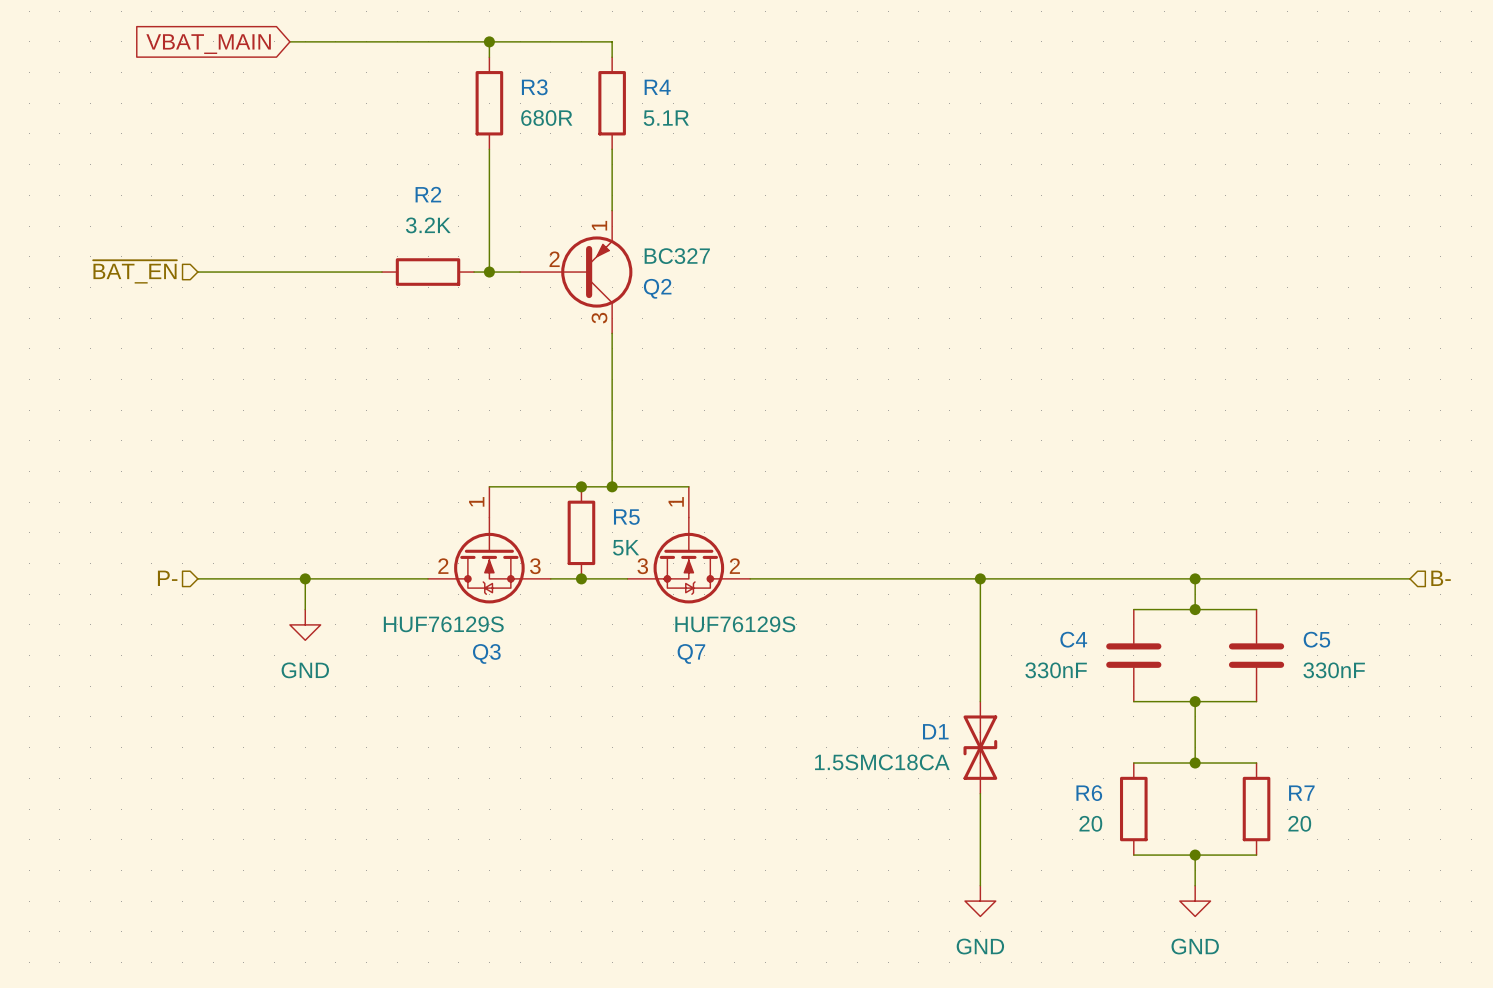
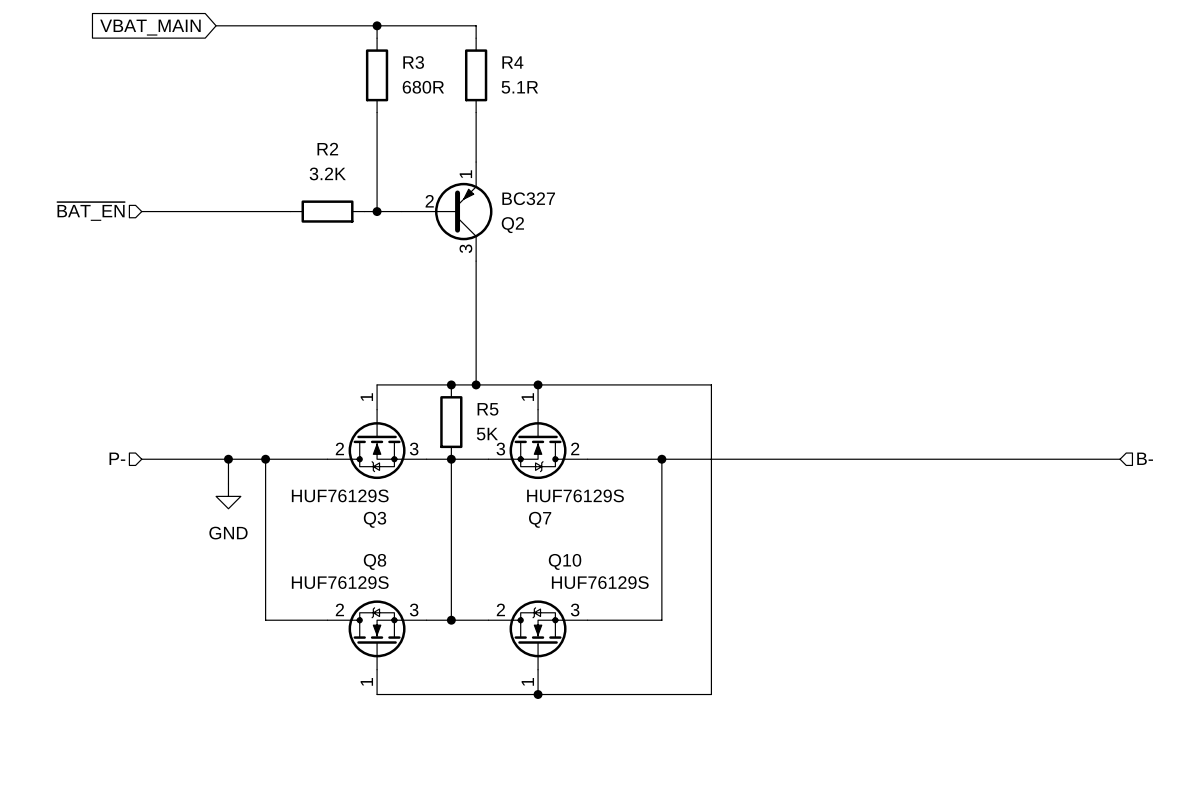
wire: none -> (538, 384) (711, 384) (711, 694) (377, 694)
junction: none -> (538, 384)
wire: none -> (265, 459) (265, 620) (327, 620)
junction: none -> (265, 459)
wire: none -> (451, 459) (451, 620)
wire: none -> (661, 459) (661, 620) (587, 620)
junction: none -> (661, 459)
wire: (980, 578) (980, 701) -> none
junction: (980, 578) -> none
wire: (1195, 578) (1195, 609) -> none
junction: (1195, 578) -> none
wire: (1133, 609) (1256, 609) -> none
junction: (1195, 609) -> none
C4: 330nF (1133, 655) -> none
C5: 330nF (1256, 655) -> none
wire: (1133, 701) (1256, 701) -> none
wire: (1195, 701) (1195, 763) -> none
junction: (1195, 701) -> none
D1: 1.5SMC18CA (980, 747) -> none
wire: (1133, 763) (1256, 763) -> none
junction: (1195, 763) -> none
wire: none -> (426, 620) (488, 620)
junction: none -> (451, 620)
wire: (980, 793) (980, 885) -> none
R6: 20 (1133, 809) -> none
R7: 20 (1256, 809) -> none
Q8: none -> HUF76129S (377, 647)
Q10: none -> HUF76129S (538, 647)
wire: (1133, 855) (1256, 855) -> none
wire: (1195, 855) (1195, 885) -> none
junction: (1195, 855) -> none
junction: none -> (538, 694)
power symbol: GND (980, 901) -> none
power symbol: GND (1195, 901) -> none

